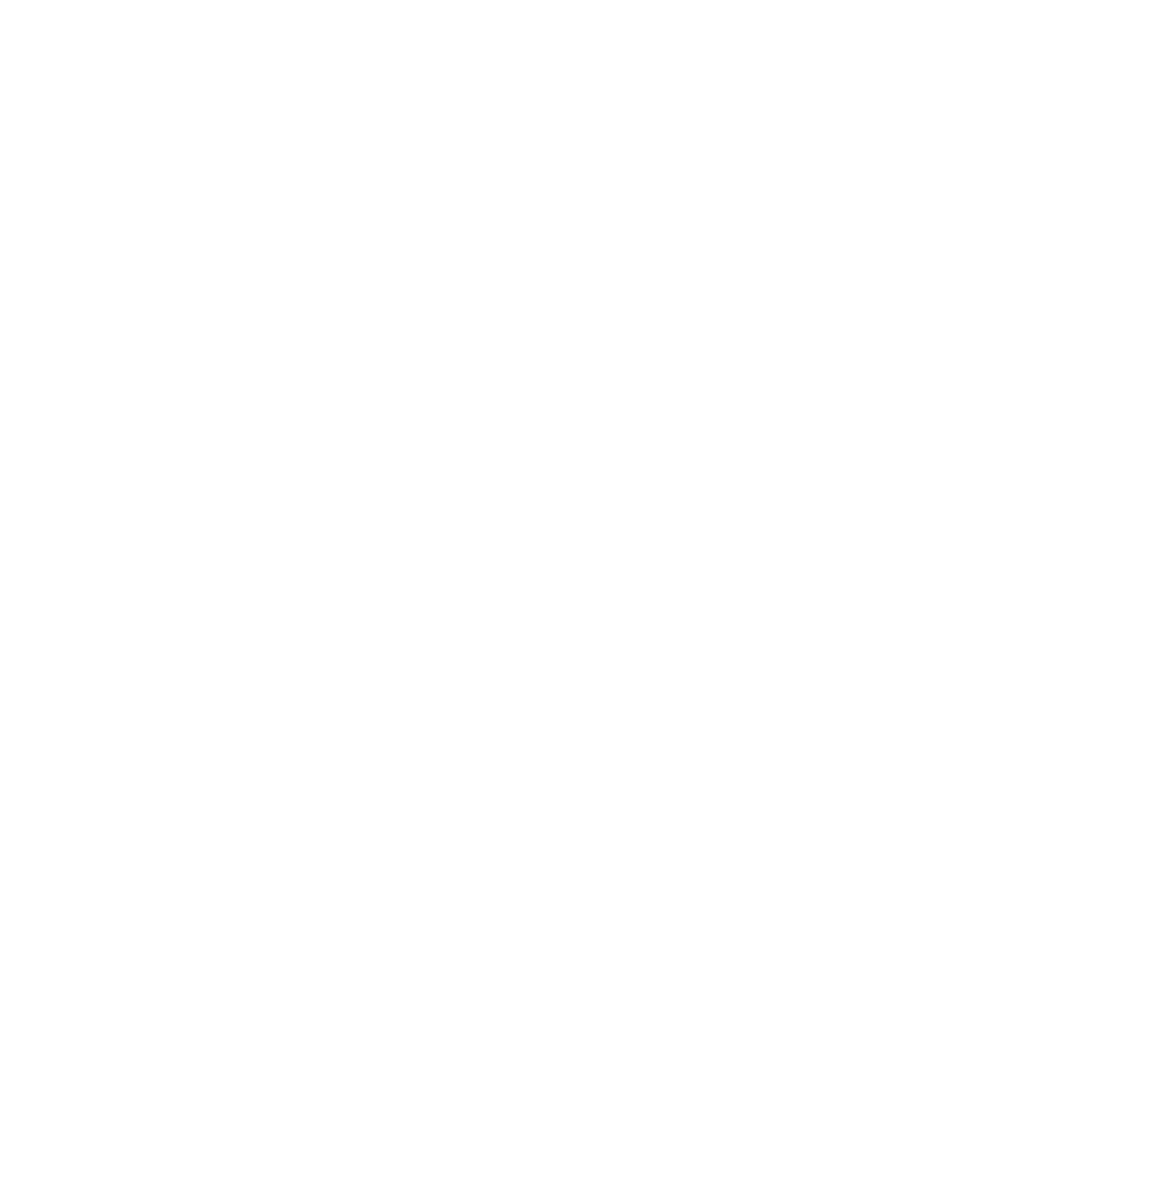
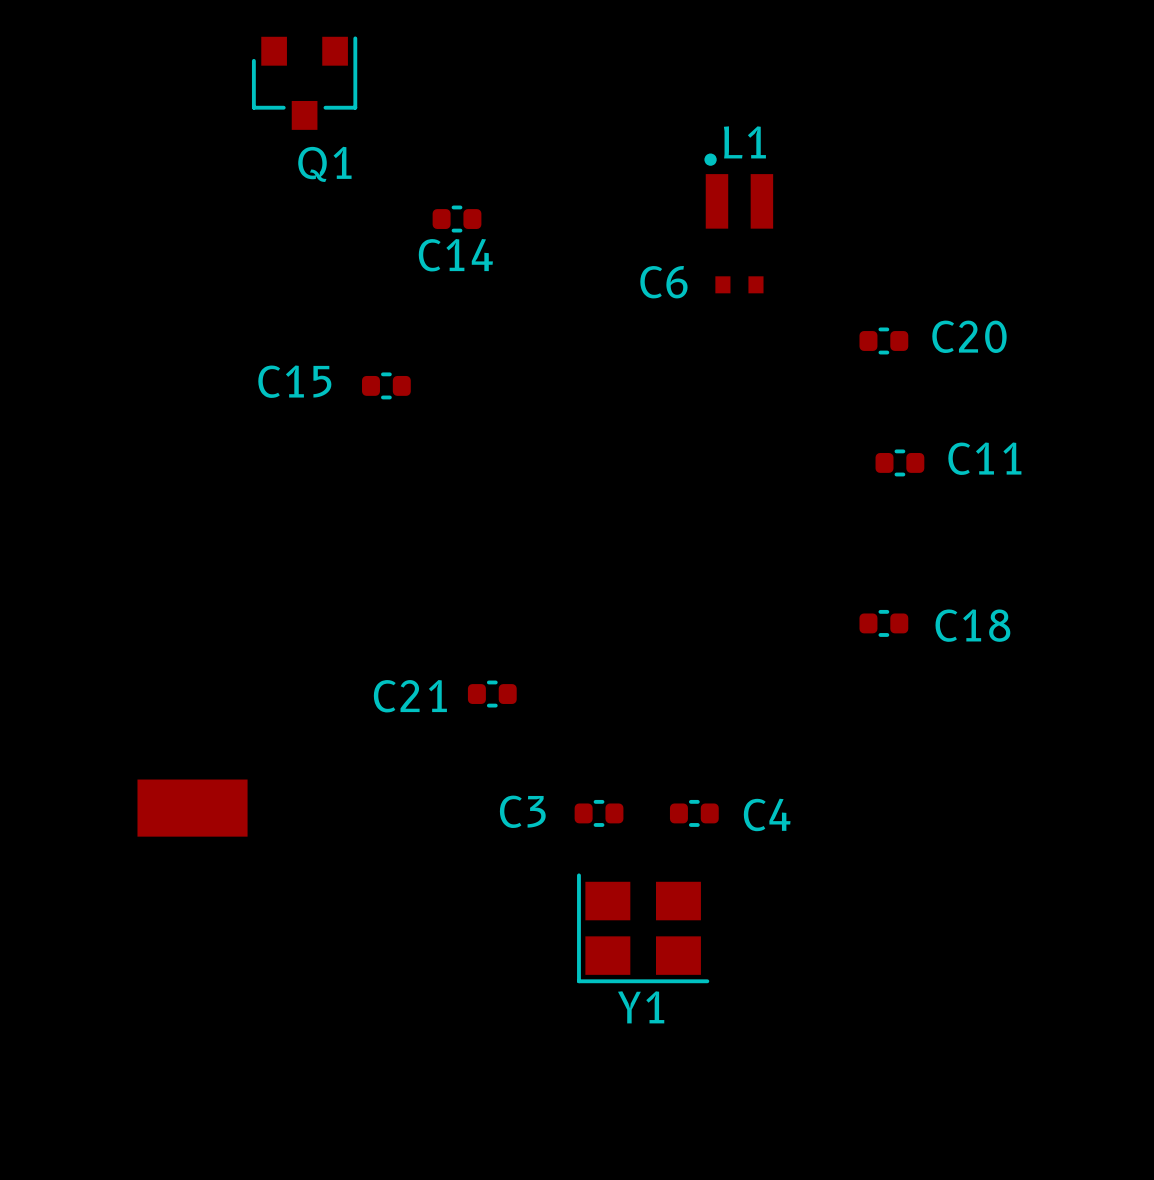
Q1: none -> (304, 83)
L1: none -> (738, 191)
C14: none -> (457, 219)
C6: none -> (739, 284)
C20: none -> (883, 340)
C15: none -> (386, 385)
C11: none -> (899, 462)
C18: none -> (883, 623)
C21: none -> (492, 694)
part: none -> (192, 808)
C3: none -> (599, 813)
C4: none -> (694, 813)
Y1: none -> (643, 928)

